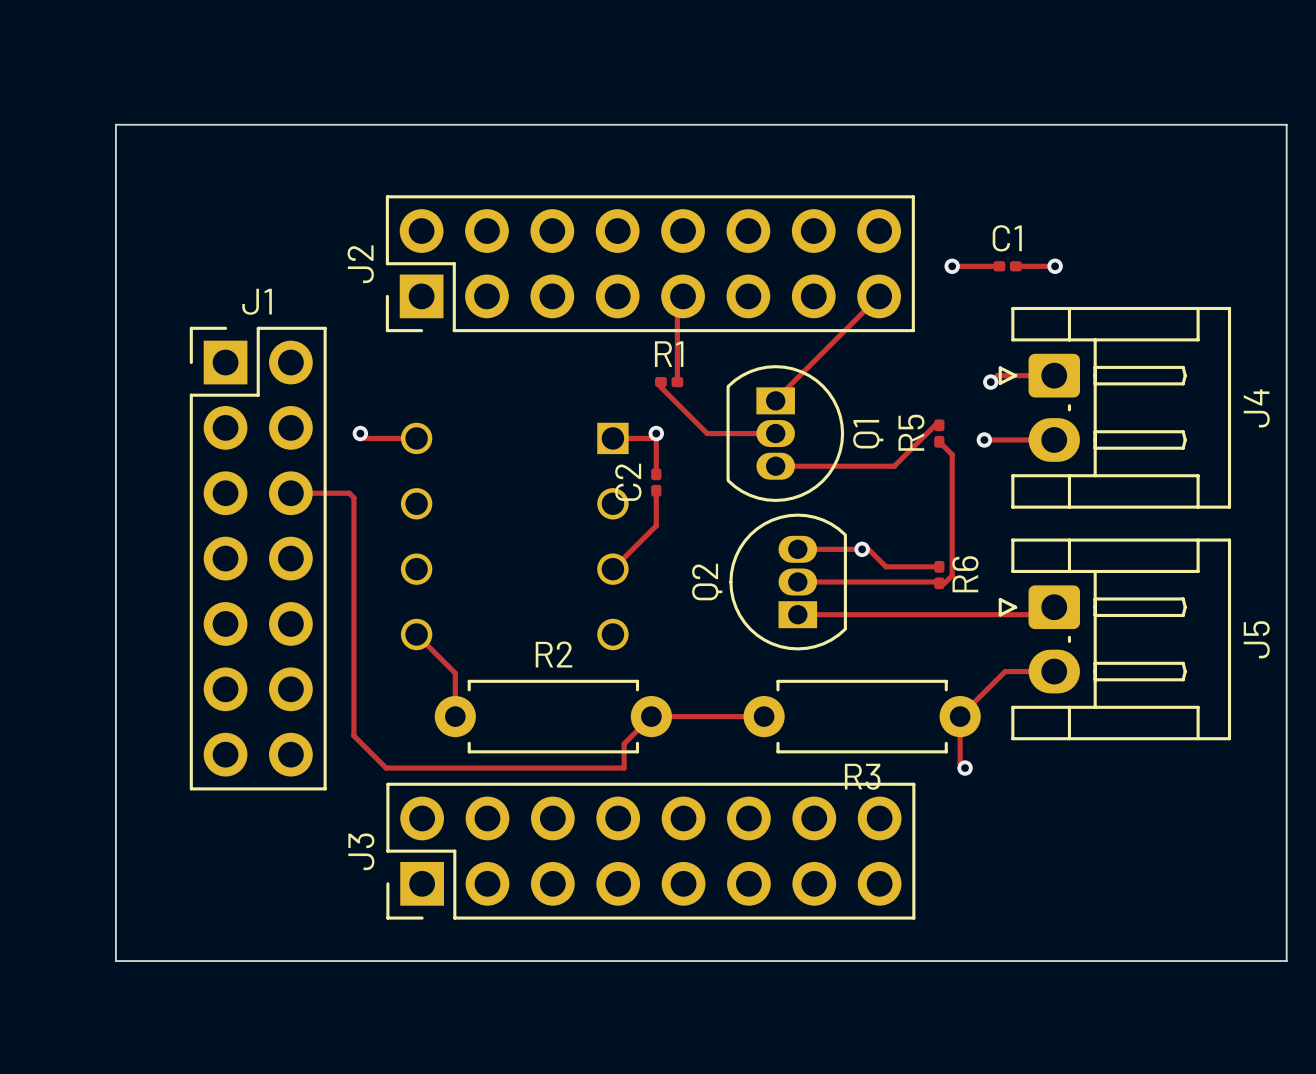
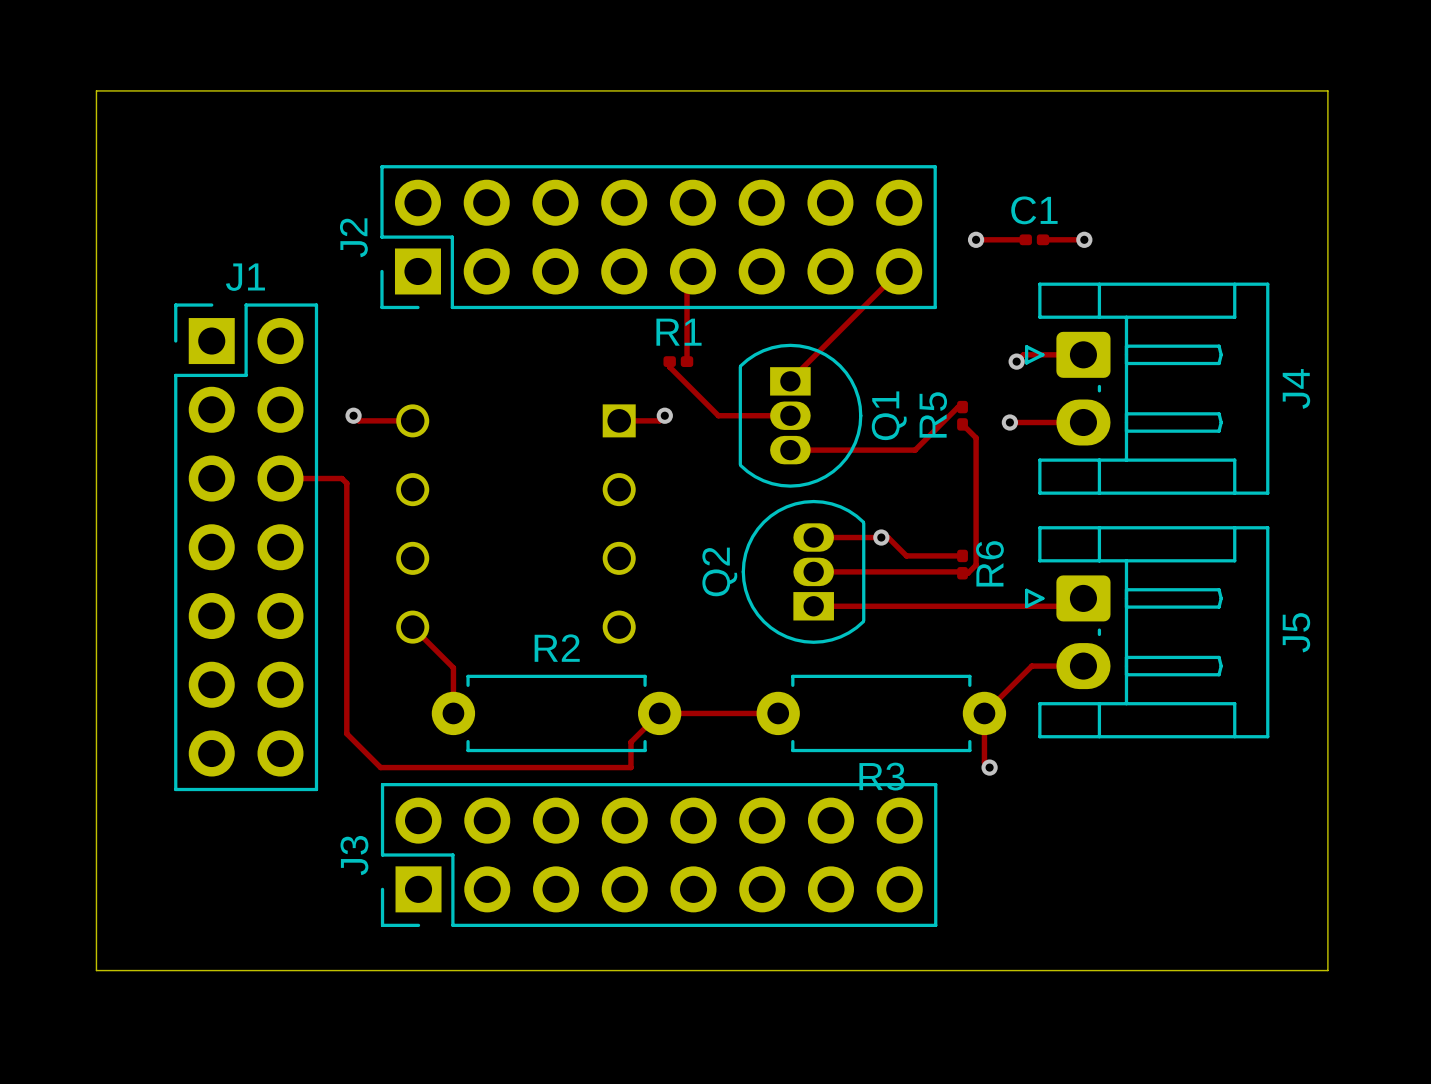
top track: (656, 433) (656, 474) -> none
C2: (656, 482) -> none
top track: (656, 490) (656, 525) (612, 569) -> none

